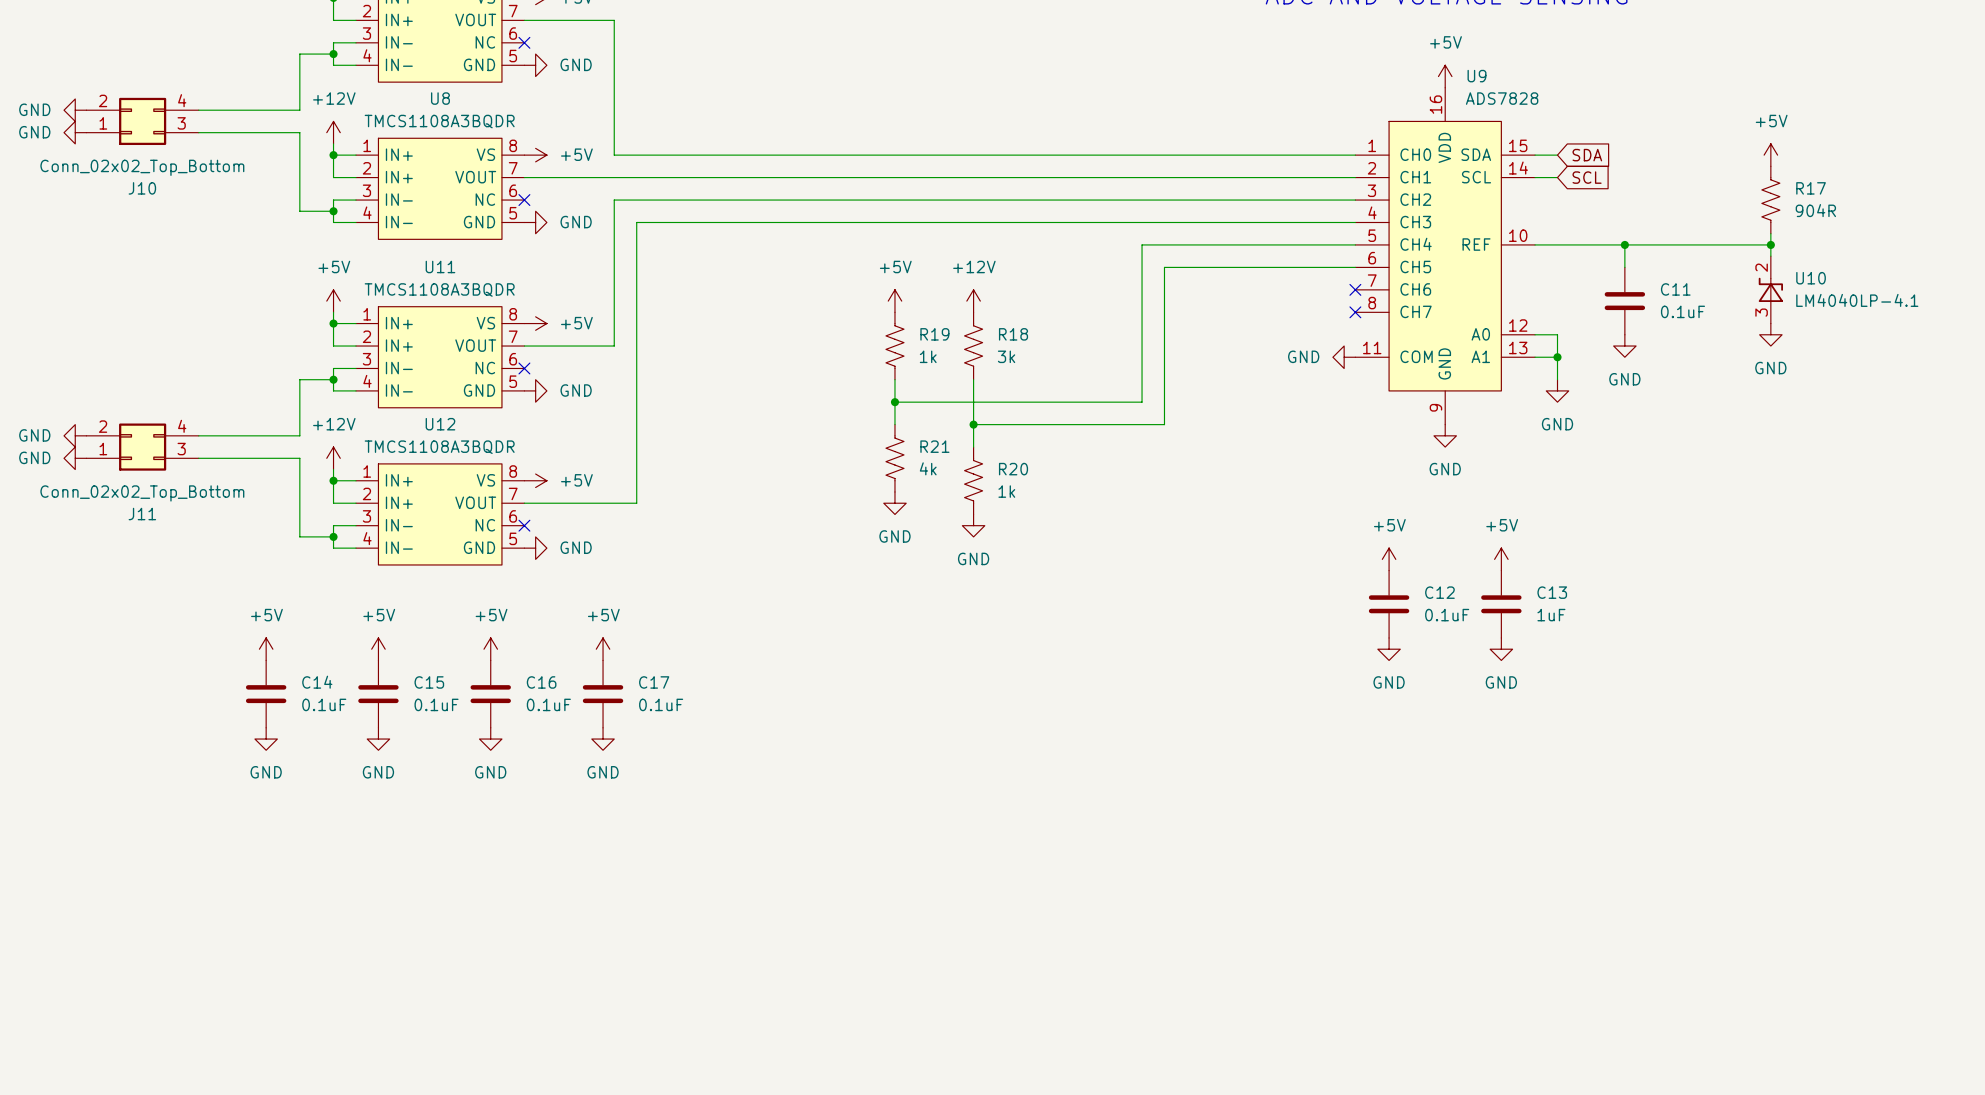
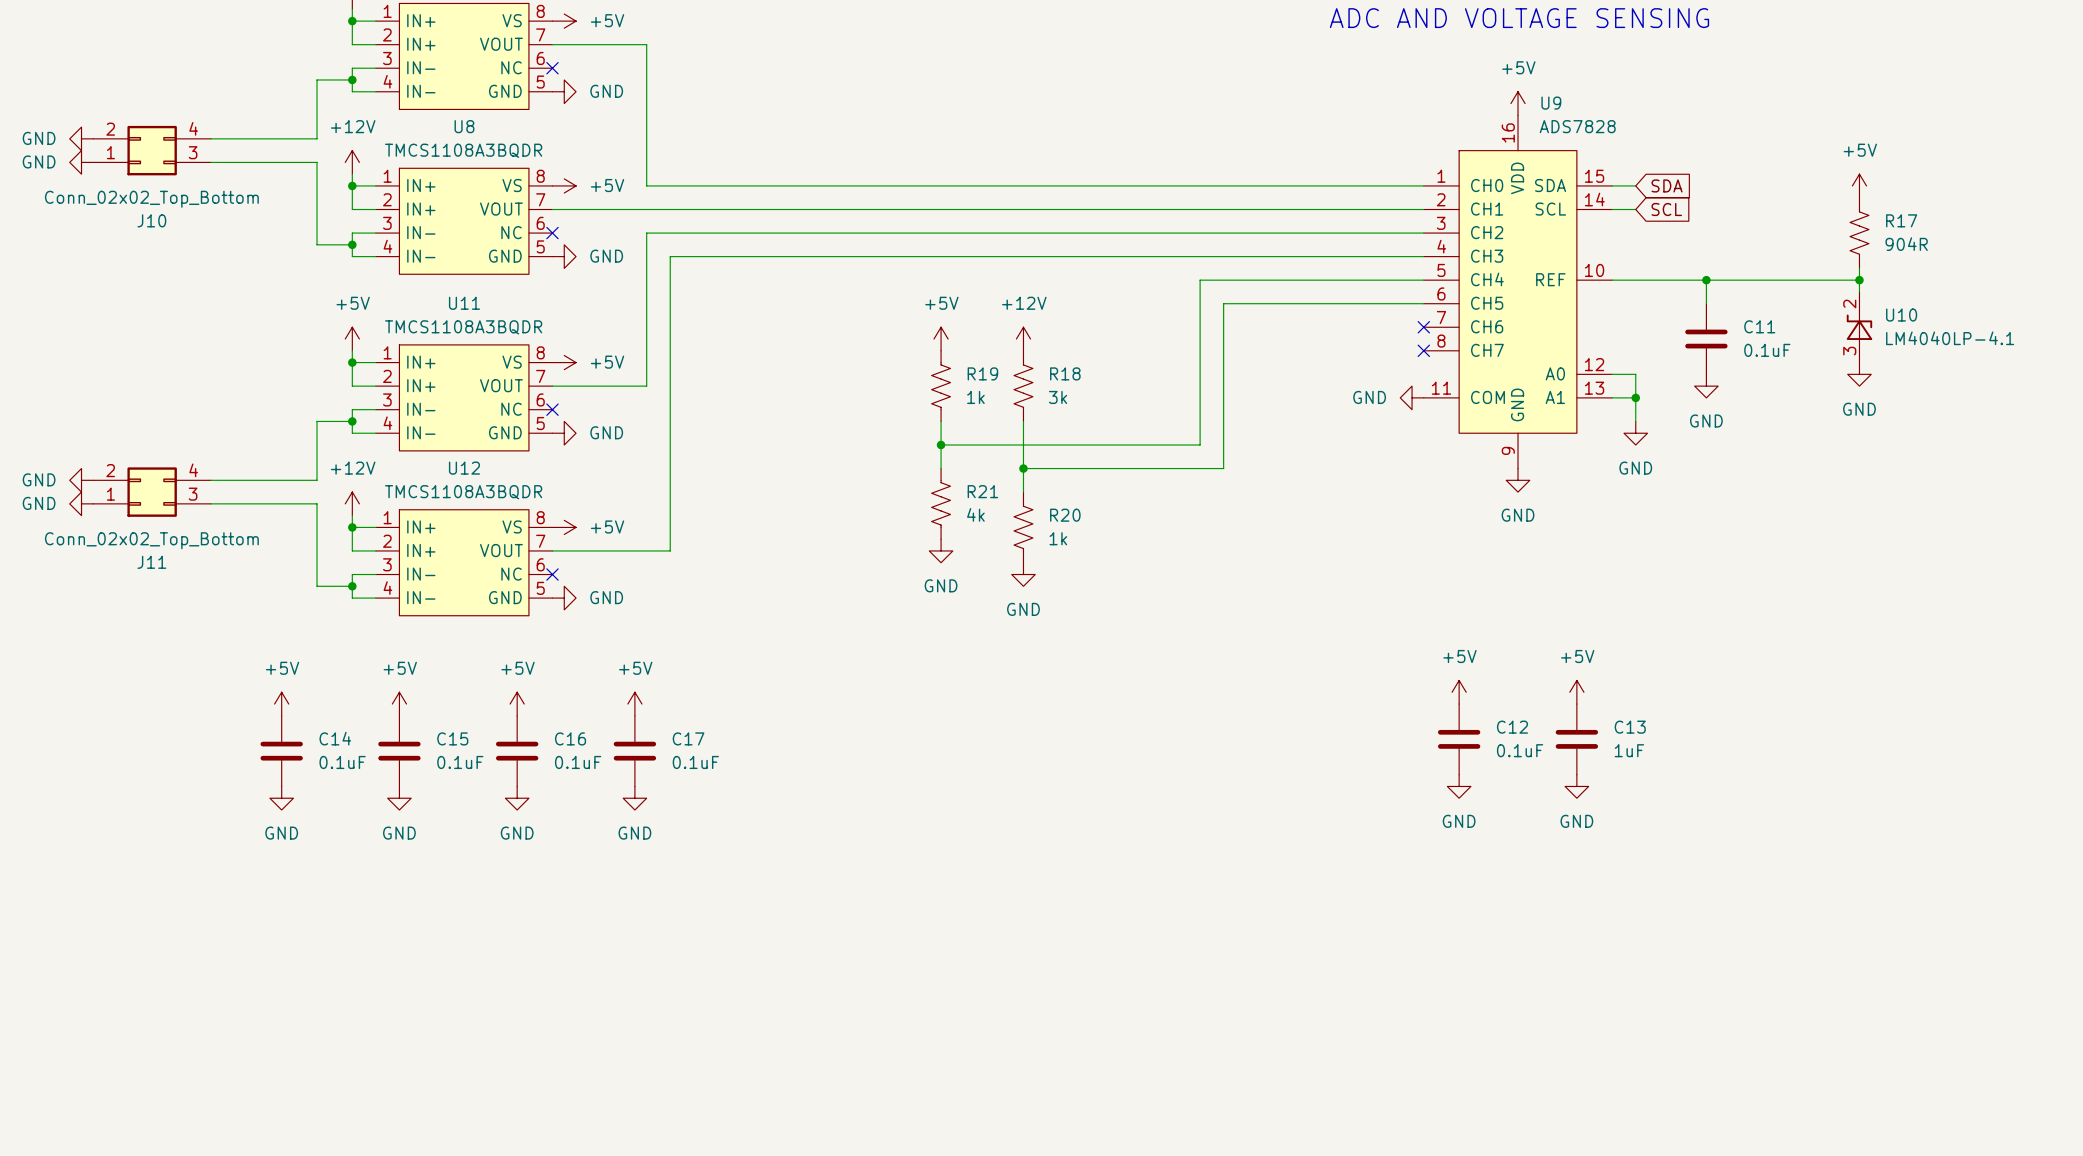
power symbol: +5V (1389, 559) -> none
power symbol: +5V (1501, 559) -> none
C12 position: (1389, 604) -> (1459, 739)
C13 position: (1501, 604) -> (1576, 739)
power symbol: none -> +5V (1459, 692)
power symbol: none -> +5V (1576, 692)
power symbol: GND (1389, 649) -> none
power symbol: GND (1501, 649) -> none
power symbol: none -> GND (1459, 786)
power symbol: none -> GND (1576, 786)

